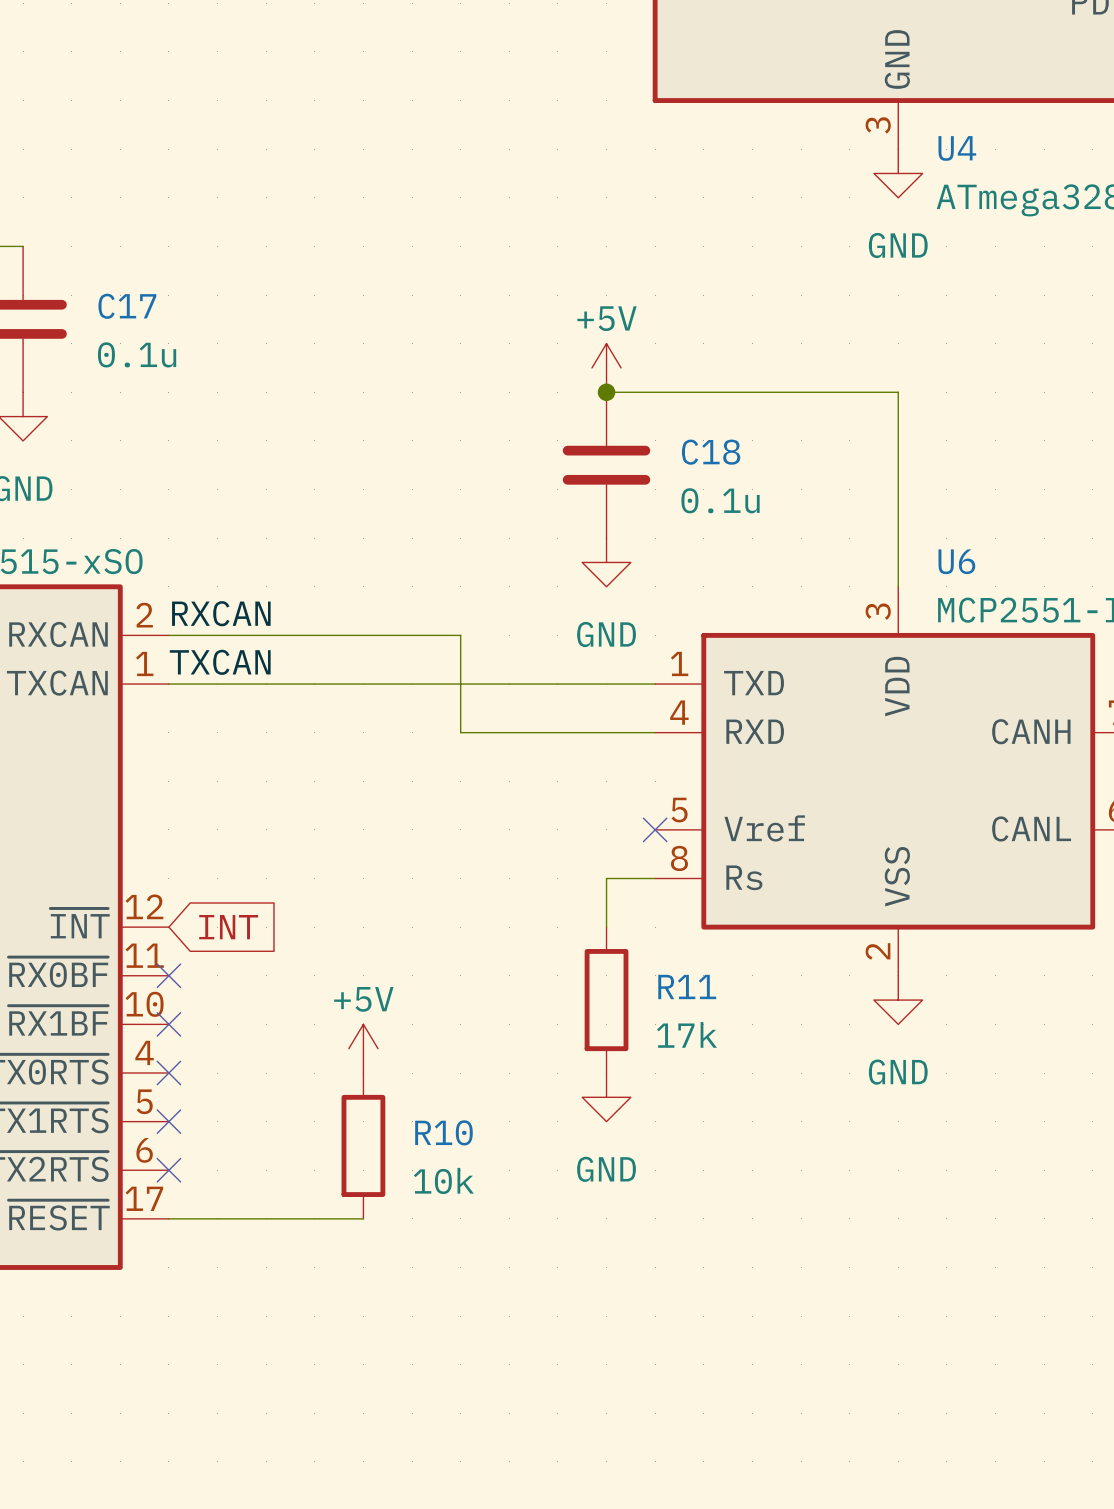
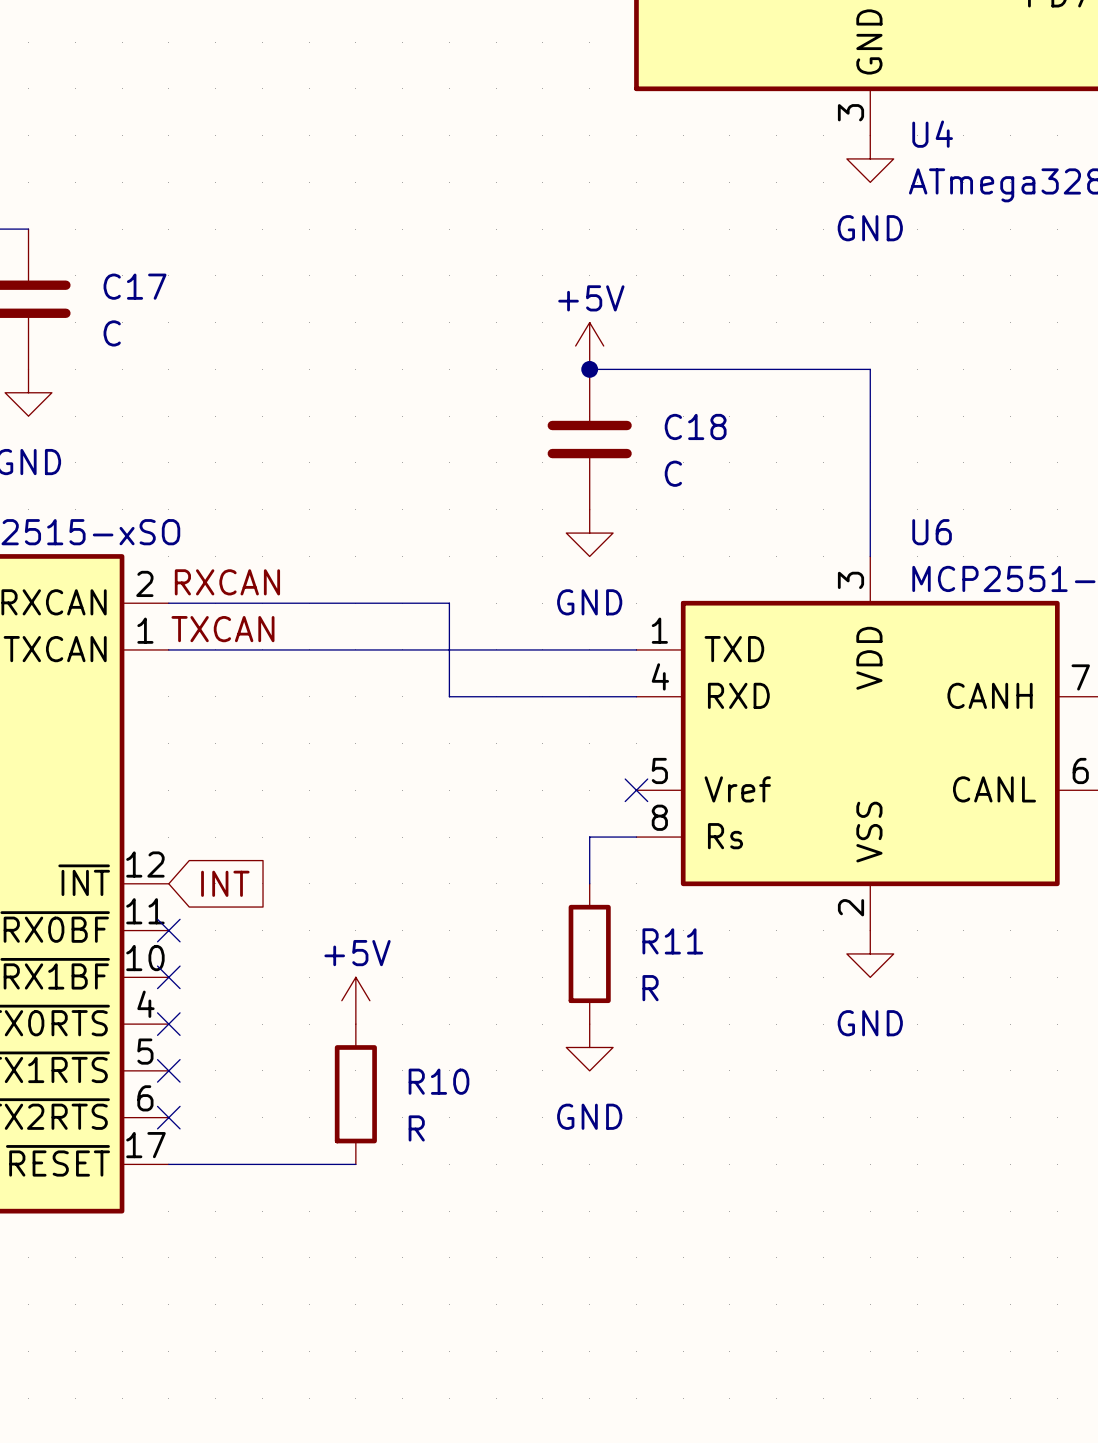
C17 value: 0.1u (137, 354) -> C (112, 333)
C18 value: 0.1u (720, 500) -> C (673, 473)
R11 value: 17k (686, 1034) -> R (650, 988)
R10 value: 10k (443, 1180) -> R (416, 1128)

